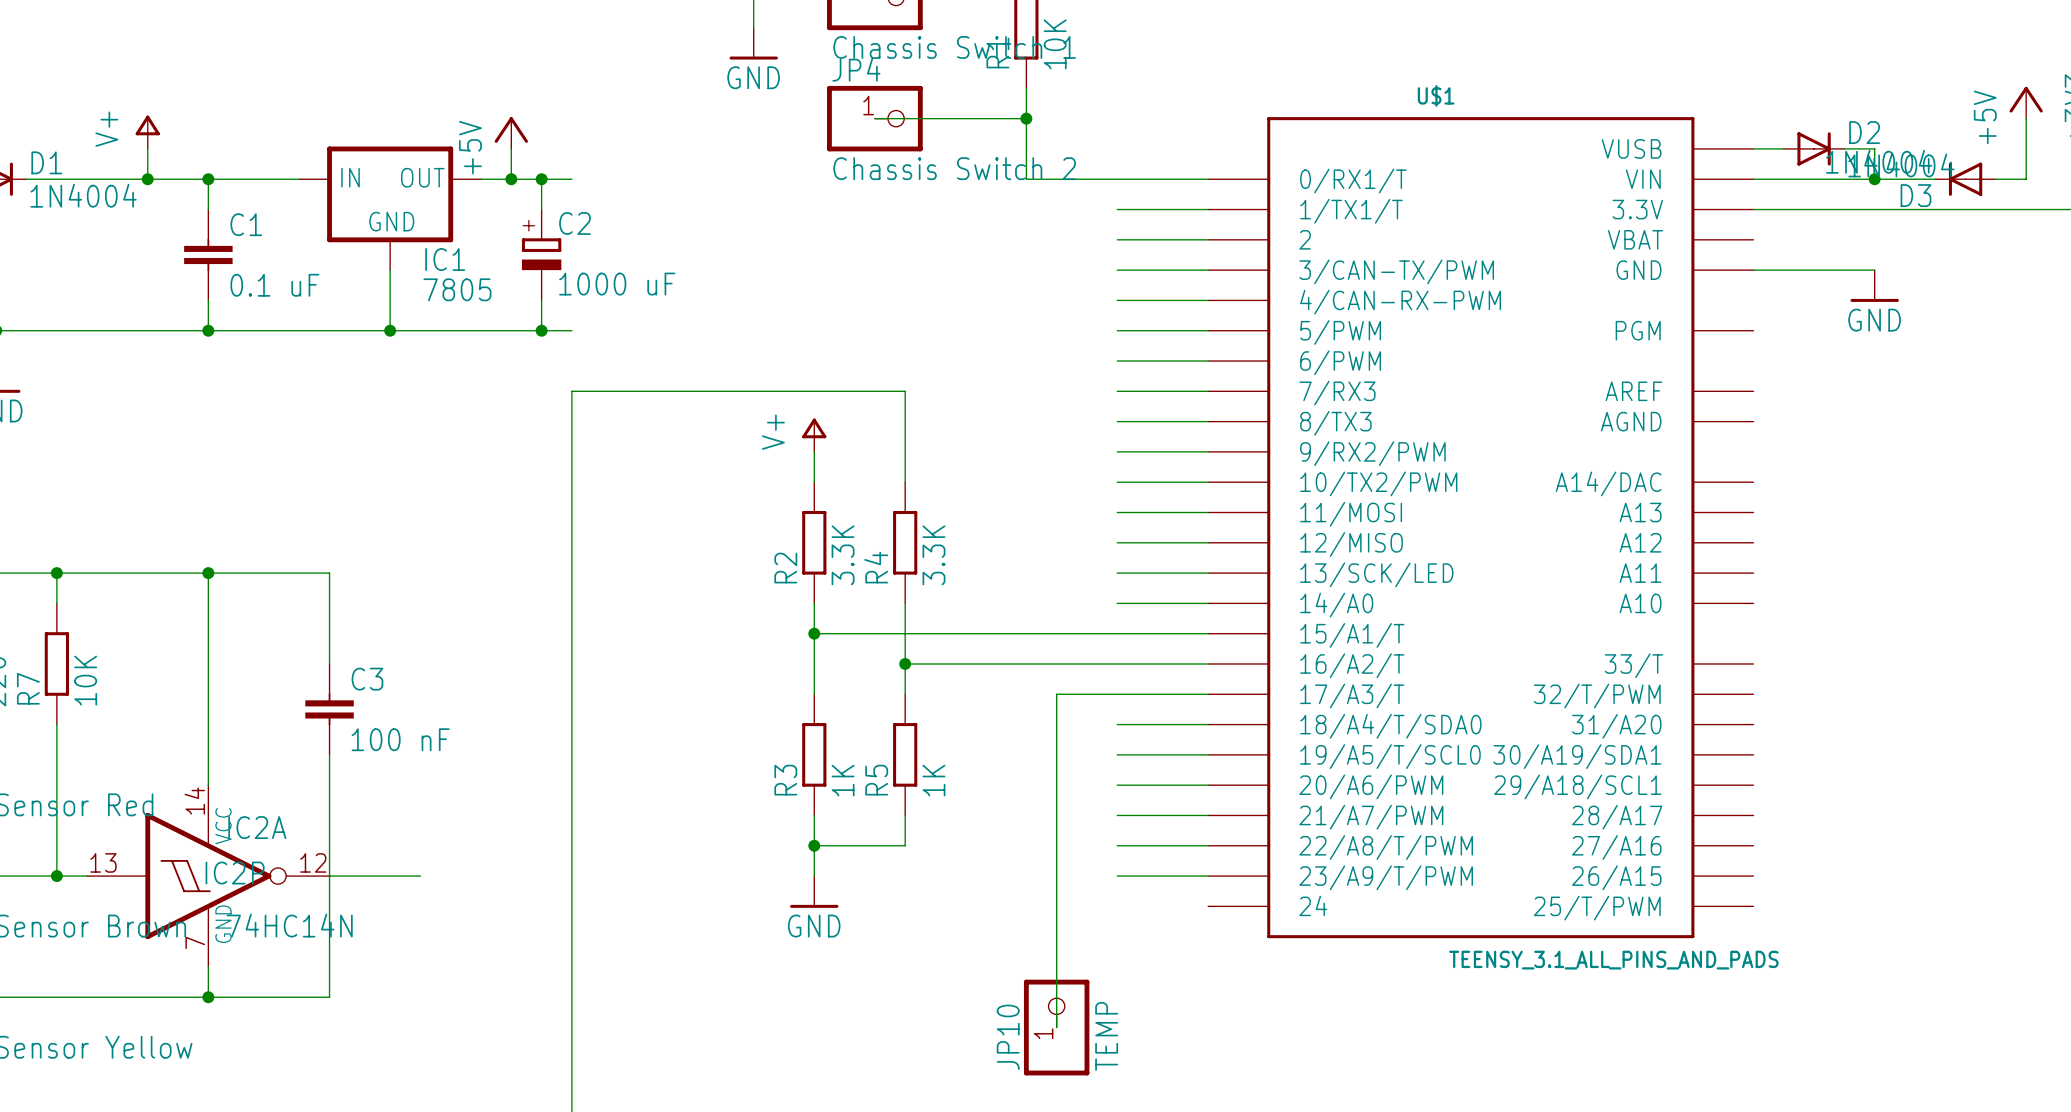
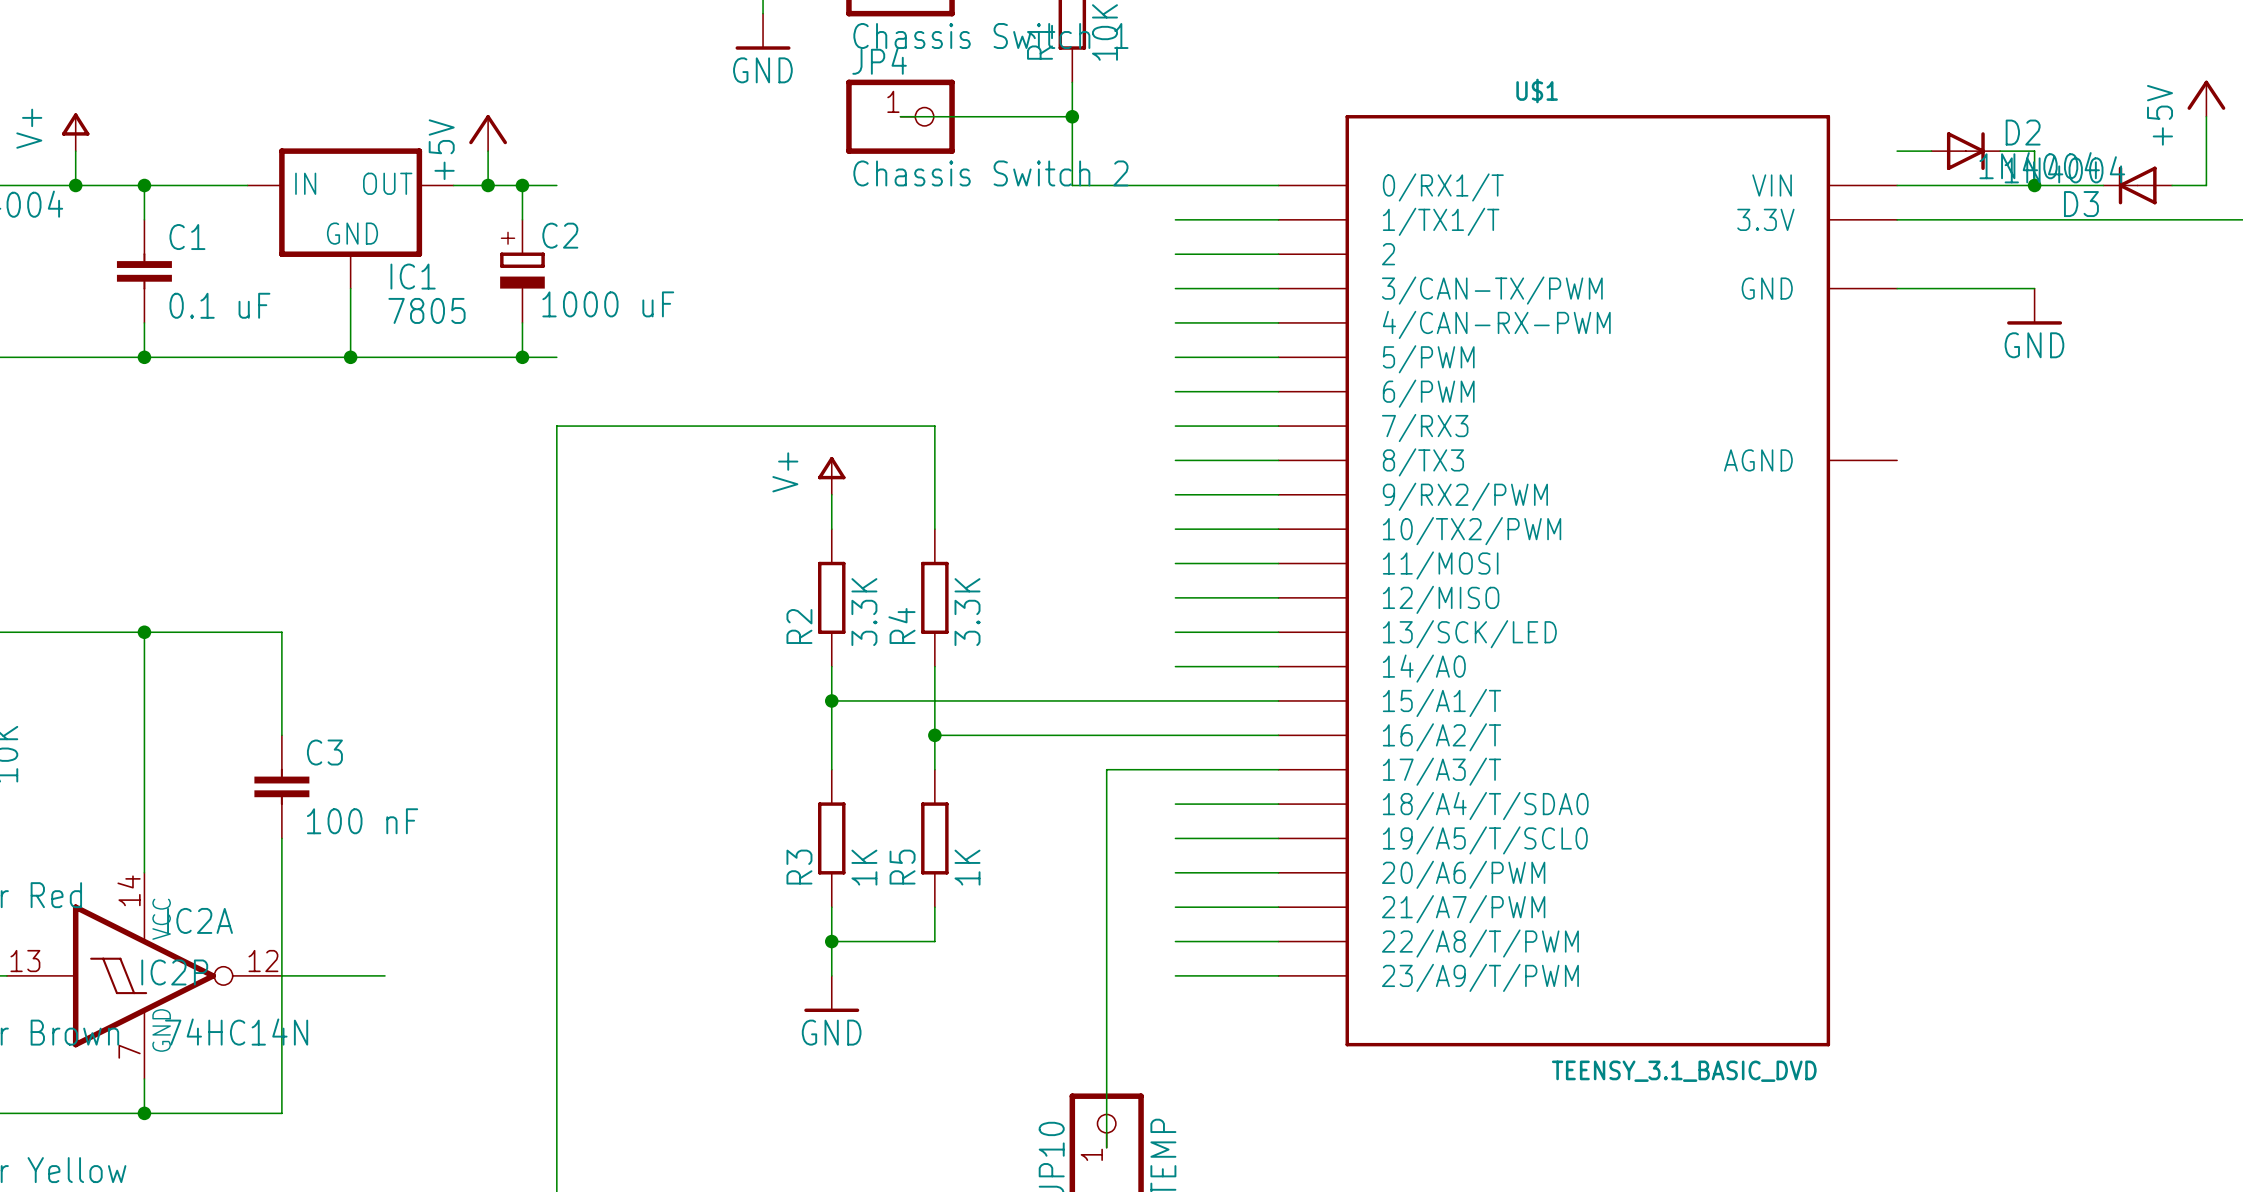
U$1 symbol: [1208, 117, 1754, 939] -> [1278, 115, 1898, 1047]
U$1 value: TEENSY_3.1_ALL_PINS_AND_PADS (1613, 960) -> TEENSY_3.1_BASIC_DVD (1684, 1071)

